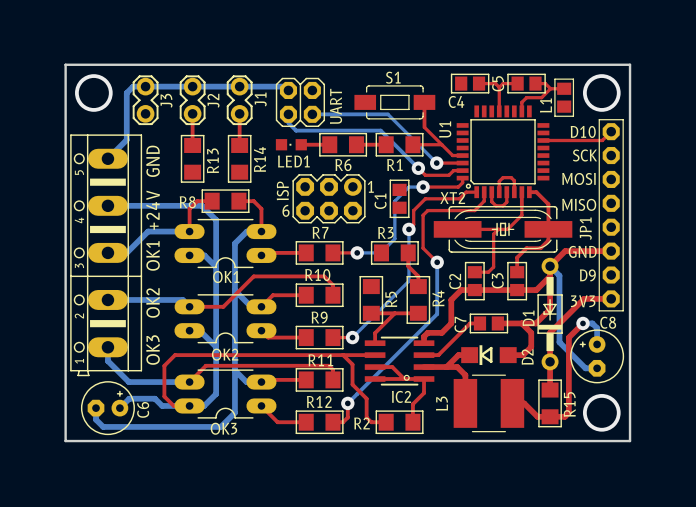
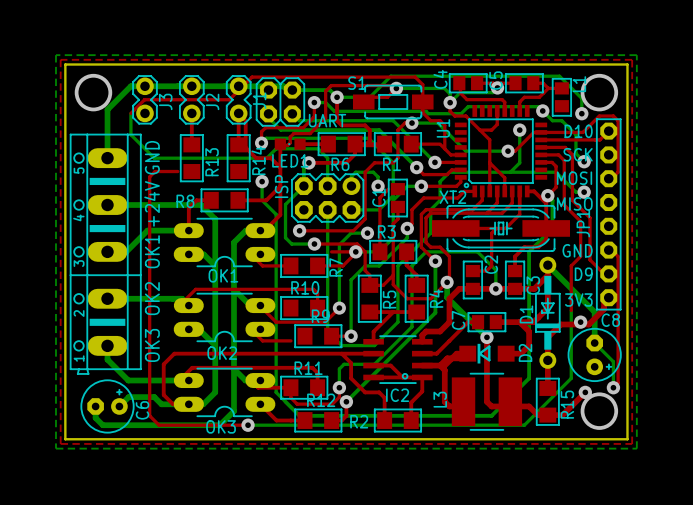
bottom zone outline: none -> (55, 55) (636, 55) (636, 448) (55, 448) (55, 55)
top zone outline: none -> (60, 59) (632, 59) (632, 443) (60, 443) (60, 59)
S1 name position: S1 (393, 77) -> S1 (357, 83)
top track: none -> (460, 83) (460, 93) (467, 99) (502, 99) (504, 102) (504, 110)
bottom track: (133, 86) (126, 92) (126, 139) (107, 158) -> (132, 86) (107, 109) (107, 158)
top track: (499, 87) (499, 111) -> (479, 130) (491, 130) (497, 124) (497, 110)
via: none -> (396, 88)
bottom track: none -> (497, 87) (492, 92) (460, 92) (450, 102) (450, 94) (444, 88) (396, 88)
via: none -> (497, 87)
bottom track: none -> (292, 90) (329, 90) (337, 97) (369, 97) (390, 76) (559, 76) (581, 98) (581, 113)
top track: none -> (337, 97) (337, 120) (341, 125) (365, 125) (369, 130) (369, 140) (365, 145)
via: none -> (337, 97)
top track: none -> (363, 97) (387, 97) (396, 88) (393, 85) (331, 85) (325, 91) (325, 118) (310, 133) (293, 133) (290, 137) (290, 142) (287, 145) (280, 145) (280, 214) (264, 230) (251, 230)
C4 name rotation: 0° (456, 101) -> 90° counterclockwise (440, 79)
C4 name position: C4 (456, 101) -> C4 (440, 79)
UART position: (300, 102) -> (280, 101)
top track: none -> (314, 102) (314, 116) (303, 127) (265, 127) (261, 131) (261, 143)
bottom track: none -> (314, 102) (325, 102) (334, 111) (426, 111) (428, 113) (461, 113) (468, 106) (538, 106) (552, 120) (561, 120) (575, 134) (575, 153) (584, 161)
via: none -> (314, 102)
top track: none -> (422, 101) (422, 84) (415, 77) (252, 77) (229, 99) (144, 99) (130, 113)
top track: none -> (450, 102) (450, 111) (454, 116) (465, 116) (489, 139) (489, 191)
via: none -> (450, 102)
L1 name position: L1 (545, 105) -> L1 (579, 84)
UART name rotation: 0° (336, 106) -> 90° clockwise (327, 120)
via: none -> (542, 110)
bottom track: none -> (130, 113) (130, 134) (154, 158) (266, 158) (276, 148) (318, 148) (327, 158) (327, 186)
top track: (424, 113) (424, 127) (443, 145) -> (422, 112) (430, 120) (440, 120) (444, 125) (444, 148)
bottom track: (288, 114) (288, 123) (296, 130) -> (268, 113) (268, 117) (280, 130) (294, 130)
bottom track: (312, 114) (387, 114) (394, 121) -> (292, 113) (299, 120) (393, 120)
via: none -> (581, 113)
top track: none -> (245, 120) (245, 147) (256, 158) (271, 158) (280, 167)
top track: none -> (412, 123) (404, 123) (397, 130) (397, 158) (393, 162) (374, 162) (365, 172) (365, 219) (353, 230) (299, 230)
bottom track: none -> (412, 123) (437, 123) (465, 151) (508, 151)
via: none -> (412, 123)
bottom track: none -> (519, 130) (519, 162) (510, 172)
via: none -> (519, 130)
bottom track: none -> (261, 143) (266, 138) (368, 138) (393, 162) (393, 195) (379, 209) (351, 209)
via: none -> (261, 143)
top track: none -> (384, 145) (355, 145) (355, 154) (346, 162) (308, 162)
top track: none -> (541, 147) (565, 147) (572, 154) (572, 200) (590, 217) (590, 259) (604, 273)
top track: none -> (508, 151) (515, 151) (533, 132) (582, 132) (599, 116) (613, 116) (618, 120) (618, 172) (611, 178) (604, 178)
via: none -> (508, 151)
top track: none -> (541, 154) (558, 154) (564, 160) (564, 205) (580, 221) (580, 256) (571, 265) (571, 310)
via: none -> (584, 161)
bottom track: none -> (308, 162) (303, 167) (303, 186) (285, 204) (285, 237) (291, 244) (314, 244)
via: none -> (308, 162)
top track: none -> (541, 162) (552, 162) (556, 166) (556, 187) (547, 195)
top track: none -> (177, 171) (155, 171) (149, 176) (149, 415) (159, 425) (248, 425)
bottom track: none -> (262, 181) (262, 200) (276, 214) (276, 392) (299, 415) (491, 415) (529, 378) (529, 251) (552, 228) (552, 200) (547, 195)
via: none -> (262, 181)
bottom track: none -> (351, 186) (351, 176) (355, 172) (373, 172) (378, 176) (378, 186)
ISP text: 1 (370, 186) -> none
via: none -> (378, 186)
top track: none -> (388, 189) (379, 197) (379, 256)
top track: (491, 192) (491, 201) (495, 205) (503, 205) (506, 202) (506, 192) -> (489, 162) (504, 177) (504, 191)
top track: (499, 192) (499, 181) (503, 177) (511, 177) (514, 180) (514, 192) -> (497, 191) (497, 202) (486, 213)
top track: none -> (512, 191) (512, 203) (502, 213) (430, 213) (426, 217) (426, 242) (430, 247) (440, 247) (449, 256) (449, 279) (430, 298) (407, 298) (393, 284) (393, 223) (397, 219) (397, 206)
bottom track: none -> (584, 192) (575, 192) (556, 172) (449, 172) (440, 181) (440, 200) (430, 209) (430, 233) (397, 265) (397, 322) (374, 345) (341, 345) (327, 331) (327, 209)
via: none -> (584, 192)
via: none -> (547, 195)
top track: (253, 201) (261, 208) (261, 231) -> (252, 200) (266, 200) (280, 186)
ISP text: 6 (286, 210) -> none
via: none -> (299, 230)
R7 name rotation: 0° (320, 232) -> 90° counterclockwise (336, 267)
R7 name position: R7 (320, 232) -> R7 (336, 267)
bottom track: none -> (367, 233) (351, 233) (339, 244) (339, 308)
via: none -> (367, 233)
bottom track: (408, 238) (408, 281) (352, 337) -> (407, 237) (379, 265) (365, 265) (351, 279) (351, 329)
top track: none -> (314, 244) (357, 244) (365, 251) (365, 270) (369, 275) (369, 285) (383, 285) (393, 275)
via: none -> (314, 244)
top track: (606, 251) (565, 251) (550, 266) -> none
top track: none -> (608, 250) (611, 250) (618, 256) (618, 383) (613, 387)
top track: (306, 252) (263, 252) (261, 255) -> none
R7 position: (319, 252) -> (304, 265)
top track: none -> (251, 254) (262, 265) (290, 265)
top track: none -> (352, 256) (342, 265) (317, 265)
bottom track: (559, 275) (559, 342) (585, 368) (597, 368) -> (557, 274) (594, 312) (594, 326)
C3 name position: C3 (497, 280) -> C3 (533, 285)
C2 name position: C2 (455, 281) -> C2 (491, 264)
bottom track: none -> (447, 282) (447, 297) (486, 337)
via: none -> (447, 282)
bottom track: none -> (495, 288) (495, 270) (477, 251) (426, 251) (412, 265) (412, 326) (374, 364) (344, 364) (339, 368) (339, 387)
via: none -> (495, 288)
top track: (306, 295) (272, 295) (261, 306) -> none
R10 position: (319, 295) -> (304, 308)
top track: (332, 295) (332, 285) (324, 276) (253, 276) (223, 306) (189, 306) -> none
top track: (611, 298) (584, 298) (550, 332) (550, 338) -> (604, 297) (604, 309) (588, 324) (560, 324) (547, 337)
top track: none -> (179, 305) (195, 289) (313, 289) (317, 293) (317, 308)
top track: none -> (262, 308) (276, 322) (325, 322) (339, 308)
via: none -> (339, 308)
bottom track: none -> (571, 310) (571, 378) (524, 425) (248, 425)
top track: (583, 323) (568, 337) (568, 412) -> (585, 392) (566, 411)
bottom track: (583, 323) (592, 323) (597, 328) -> none
top track: none -> (251, 329) (262, 340) (290, 340)
top track: (261, 330) (268, 337) (306, 337) -> none
via: none -> (486, 337)
bottom track: none -> (594, 343) (613, 361) (613, 387)
C8 rotation: 0° (597, 356) -> 180° (594, 354)
top track: none -> (467, 358) (447, 358) (440, 365) (444, 370) (444, 401) (449, 406) (463, 406)
top track: (441, 367) (457, 367) (465, 375) (465, 403) -> none
top track: (306, 379) (263, 379) (261, 382) -> none
R11 position: (319, 379) -> (304, 387)
top track: (332, 379) (332, 369) (329, 365) (205, 365) (189, 382) -> none
top track: (352, 379) (352, 384) (366, 398) (366, 417) (371, 422) (386, 422) -> (351, 378) (365, 392) (379, 392) (384, 397) (384, 420)
top track: none -> (179, 380) (192, 367) (312, 367) (317, 372) (317, 387)
top track: none -> (251, 380) (258, 387) (290, 387) (290, 397) (297, 404) (332, 404) (339, 397) (339, 387)
via: none -> (339, 387)
via: none -> (613, 387)
via: none -> (585, 392)
top track: (512, 403) (524, 403) (537, 416) (539, 416) -> (486, 337) (486, 401) (491, 406) (529, 406) (537, 415)
via: none -> (248, 425)

